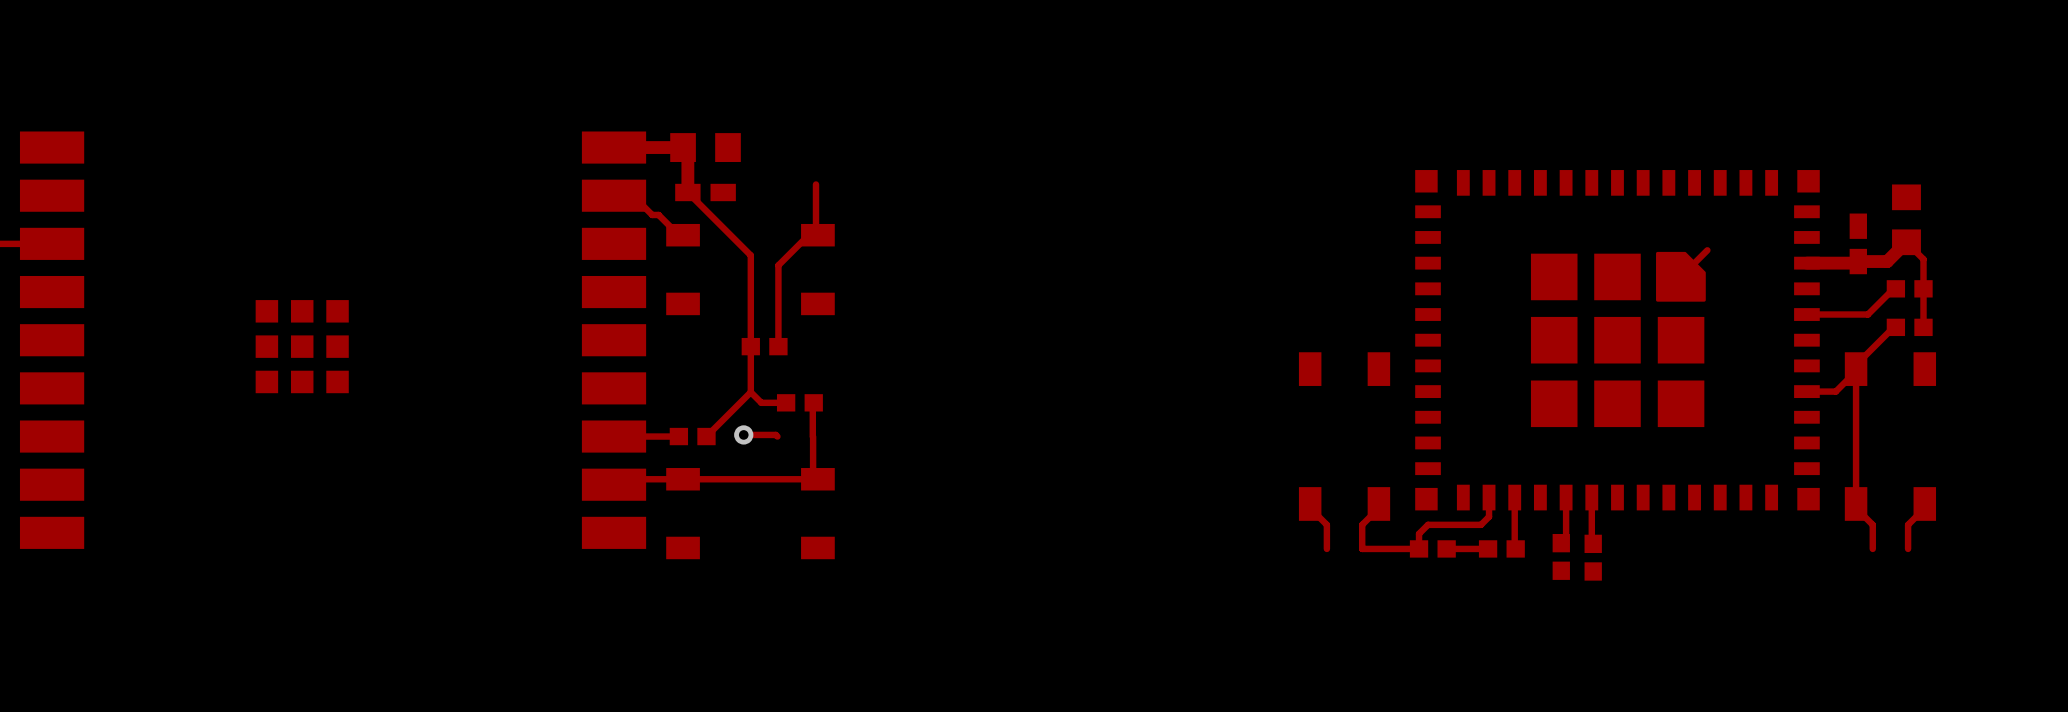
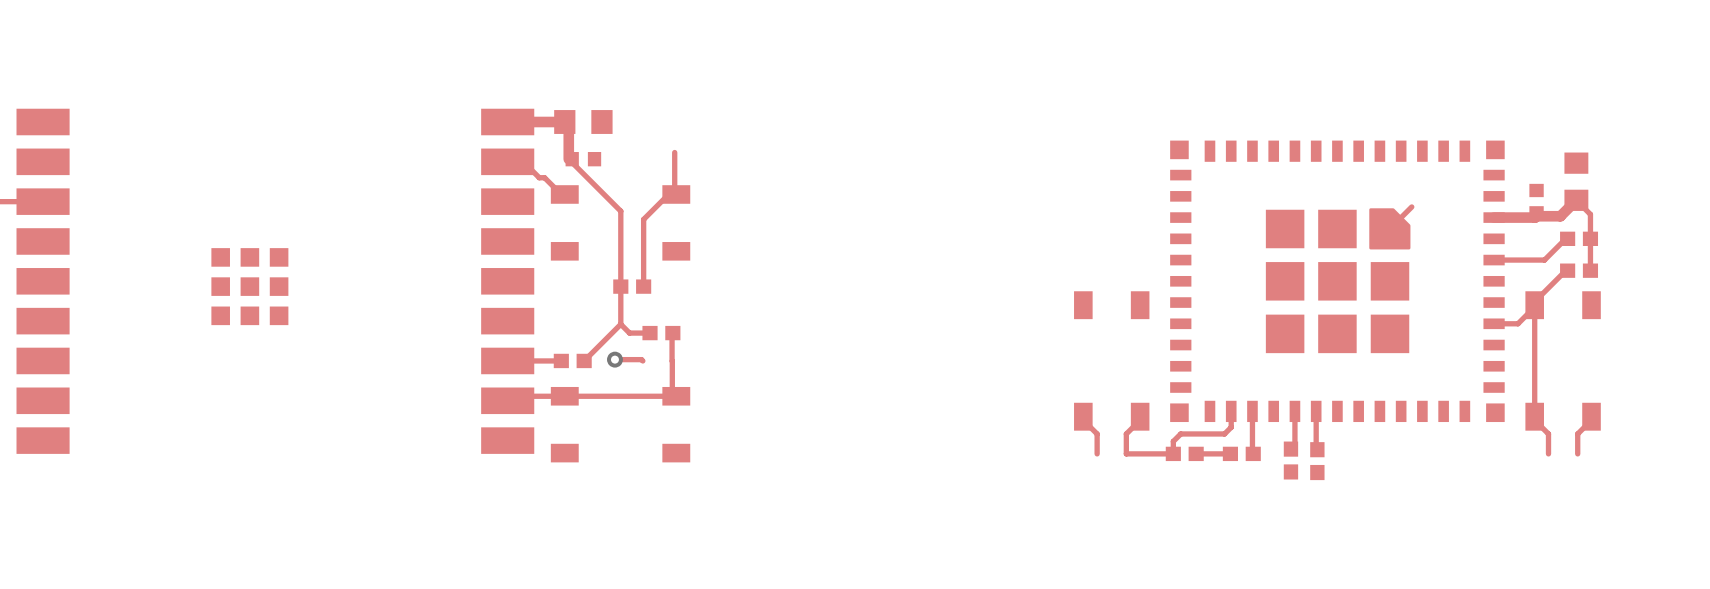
part footprint: [675, 183, 736, 202] -> [565, 152, 602, 167]
part footprint: [1849, 213, 1867, 275] -> [1529, 183, 1544, 220]

